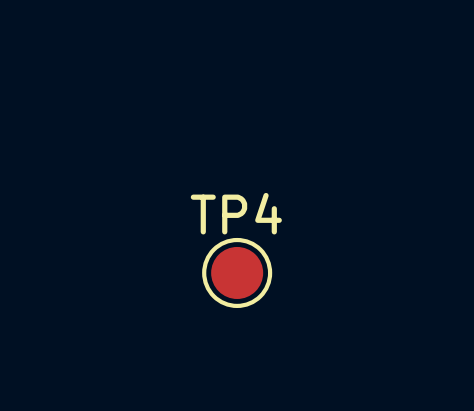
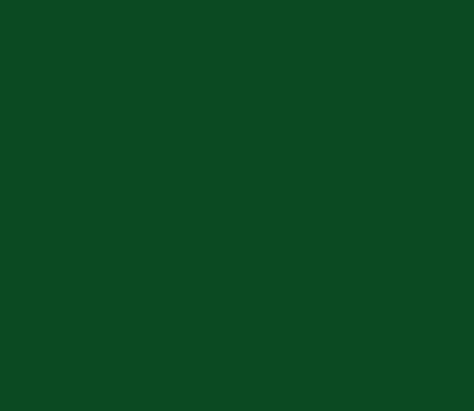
TP4: (237, 272) -> none

